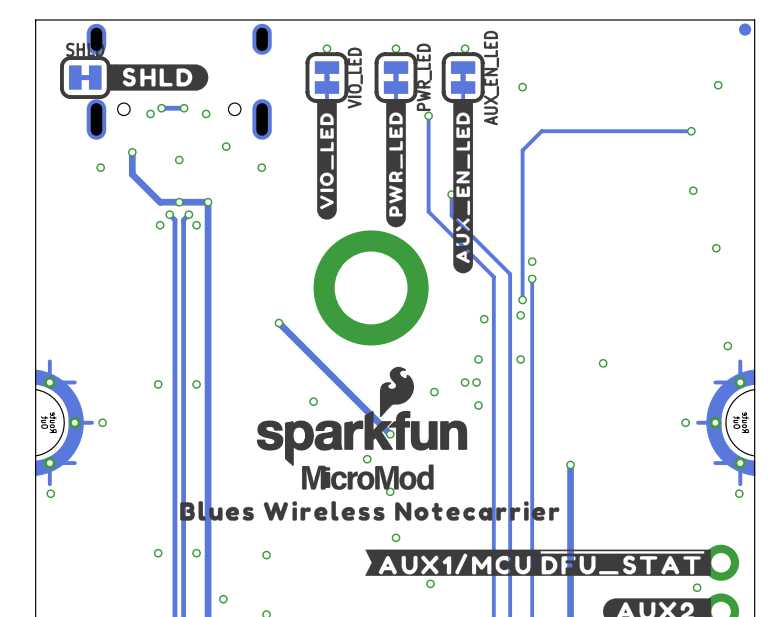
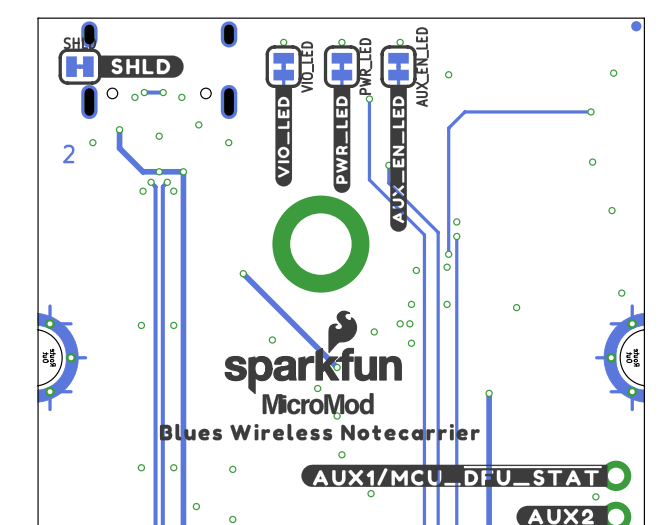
text: none -> 2 (68, 154)
via: (102, 422) -> none
via: (685, 422) -> none
via: (50, 493) -> none
via: (739, 493) -> none
drawing shape: [365, 549, 711, 576] -> [301, 464, 608, 487]

